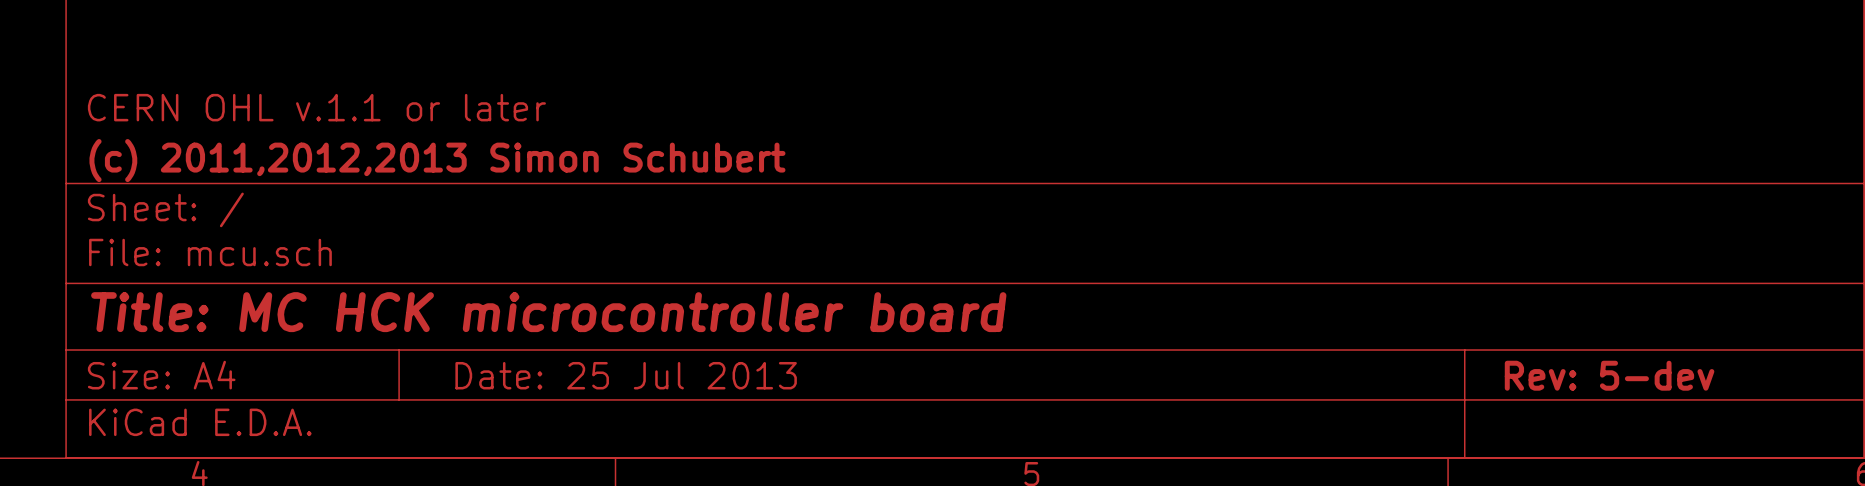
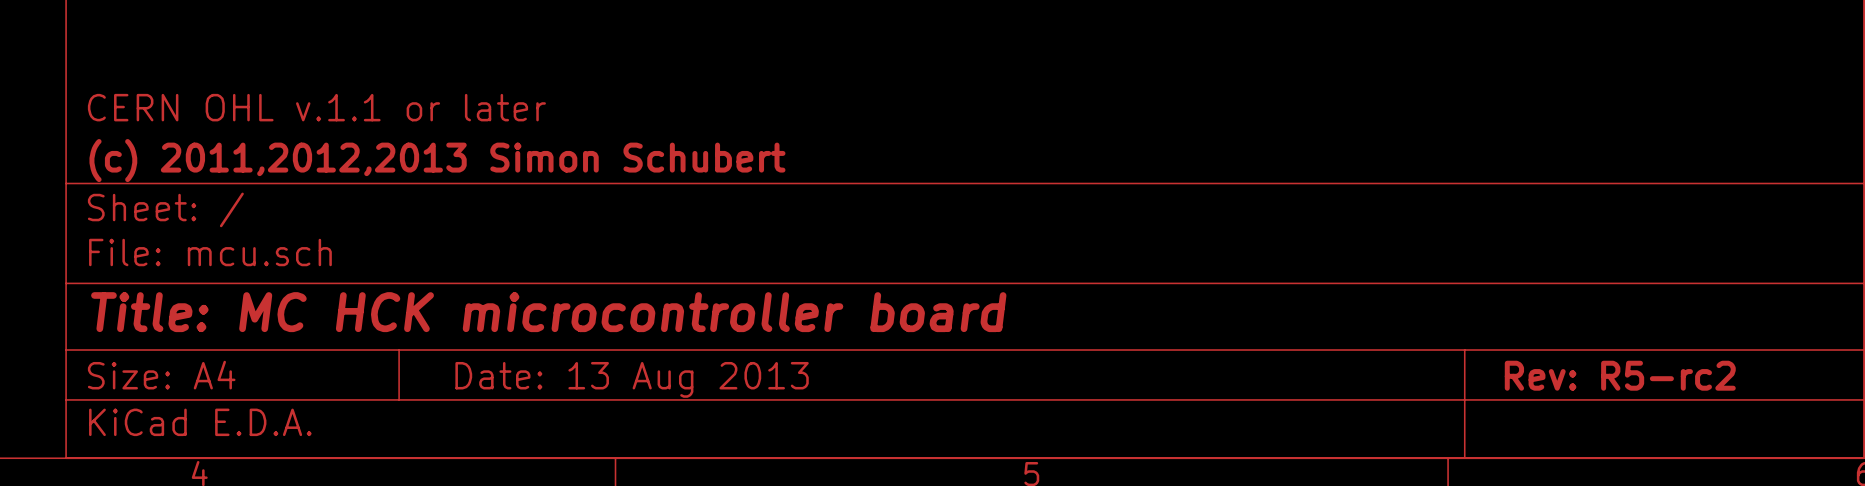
title block: Date: 25 Jul 2013 (626, 375) -> Date: 13 Aug 2013 (632, 379)
title block: Rev: 5-dev (1609, 375) -> Rev: R5-rc2 (1620, 375)

